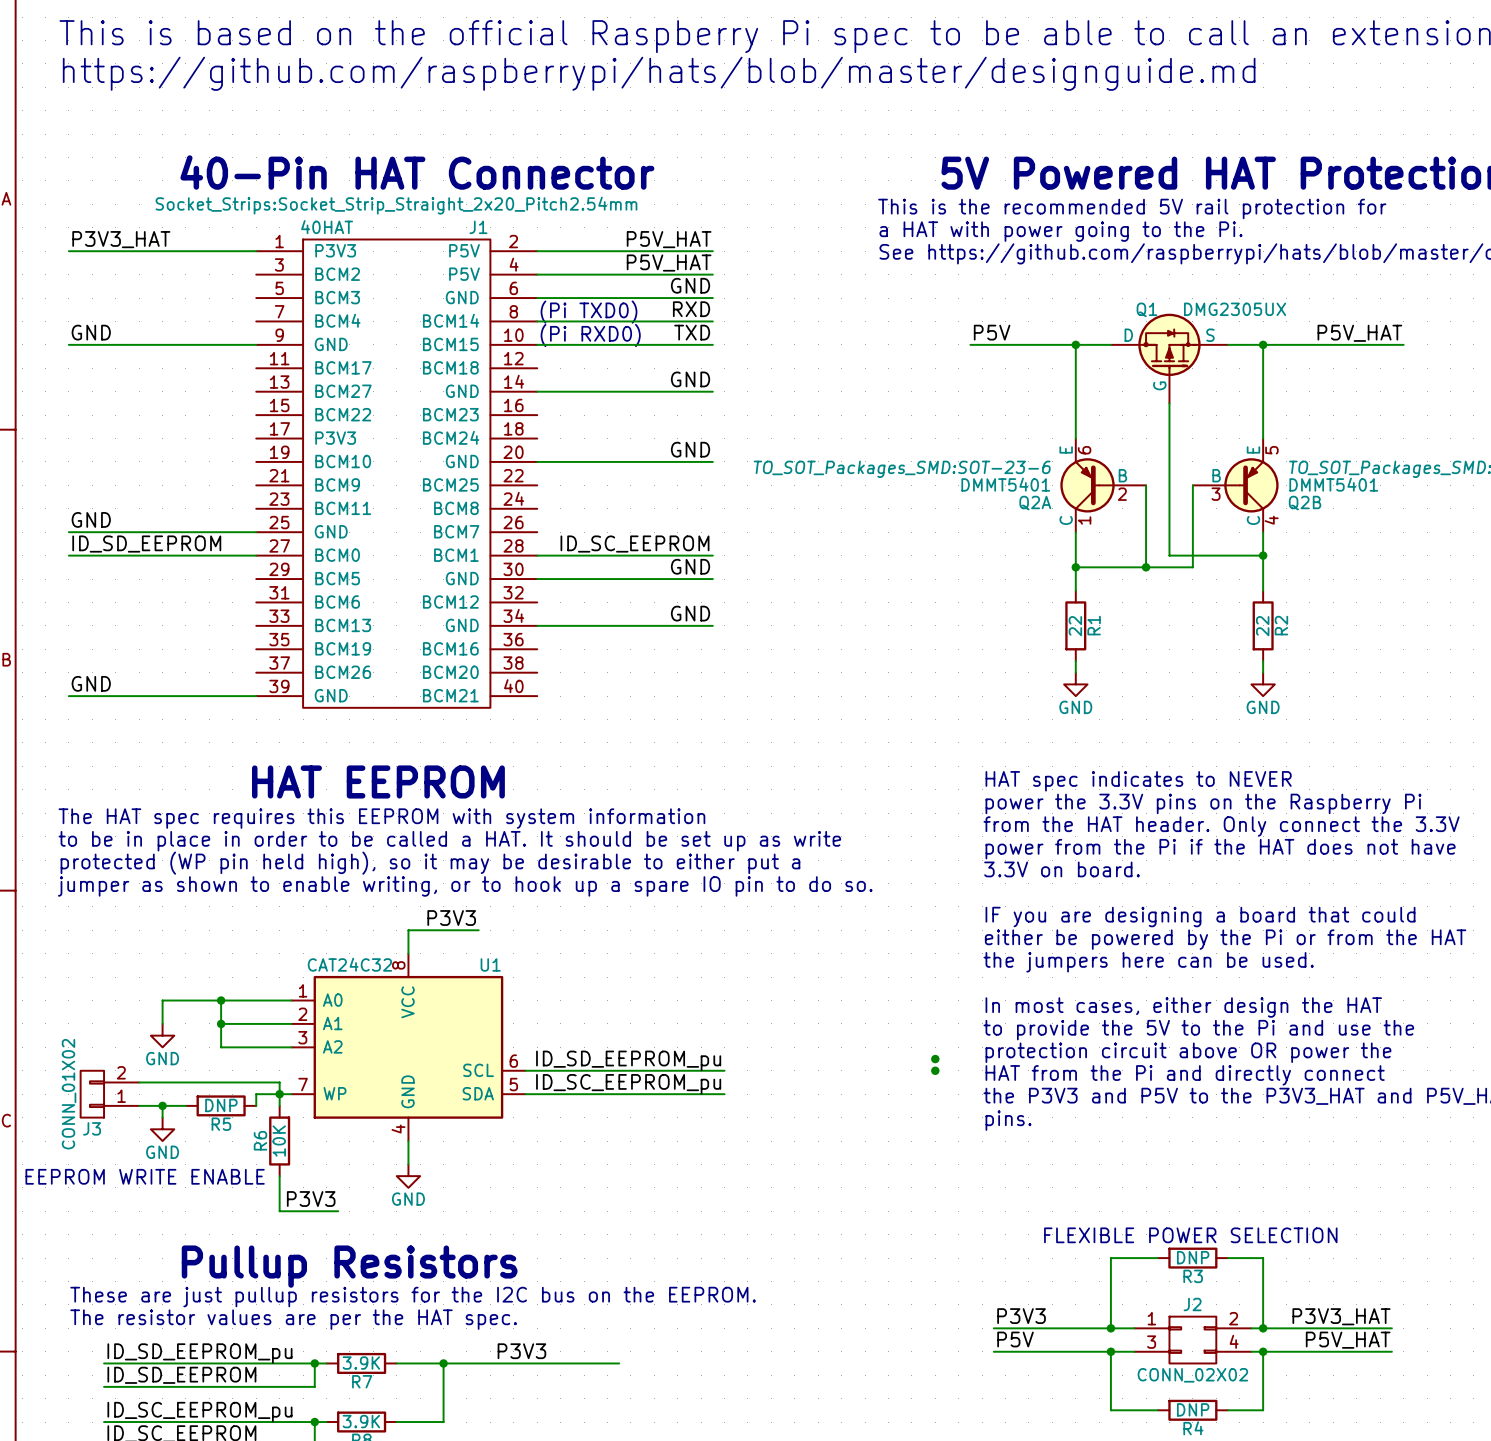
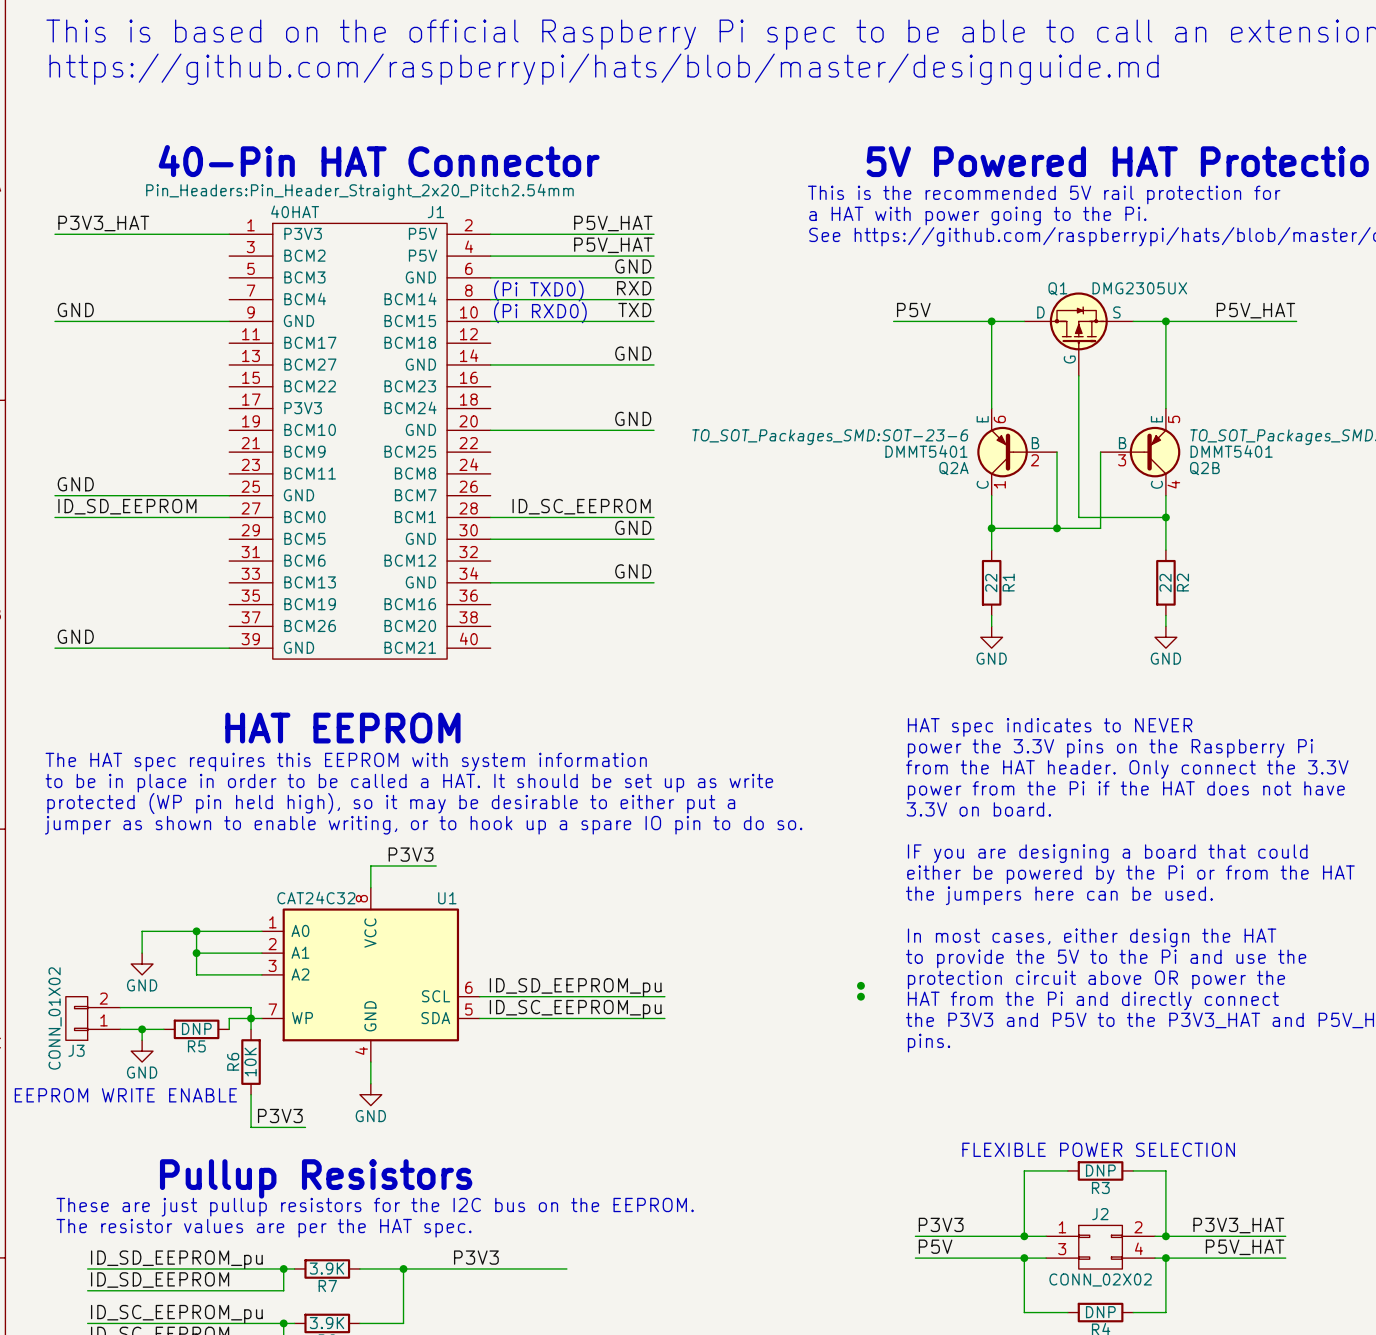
J1 text: Socket_Strips:Socket_Strip_Straight_2x20_Pitch2.54mm (396, 205) -> Pin_Headers:Pin_Header_Straight_2x20_Pitch2.54mm (359, 191)

